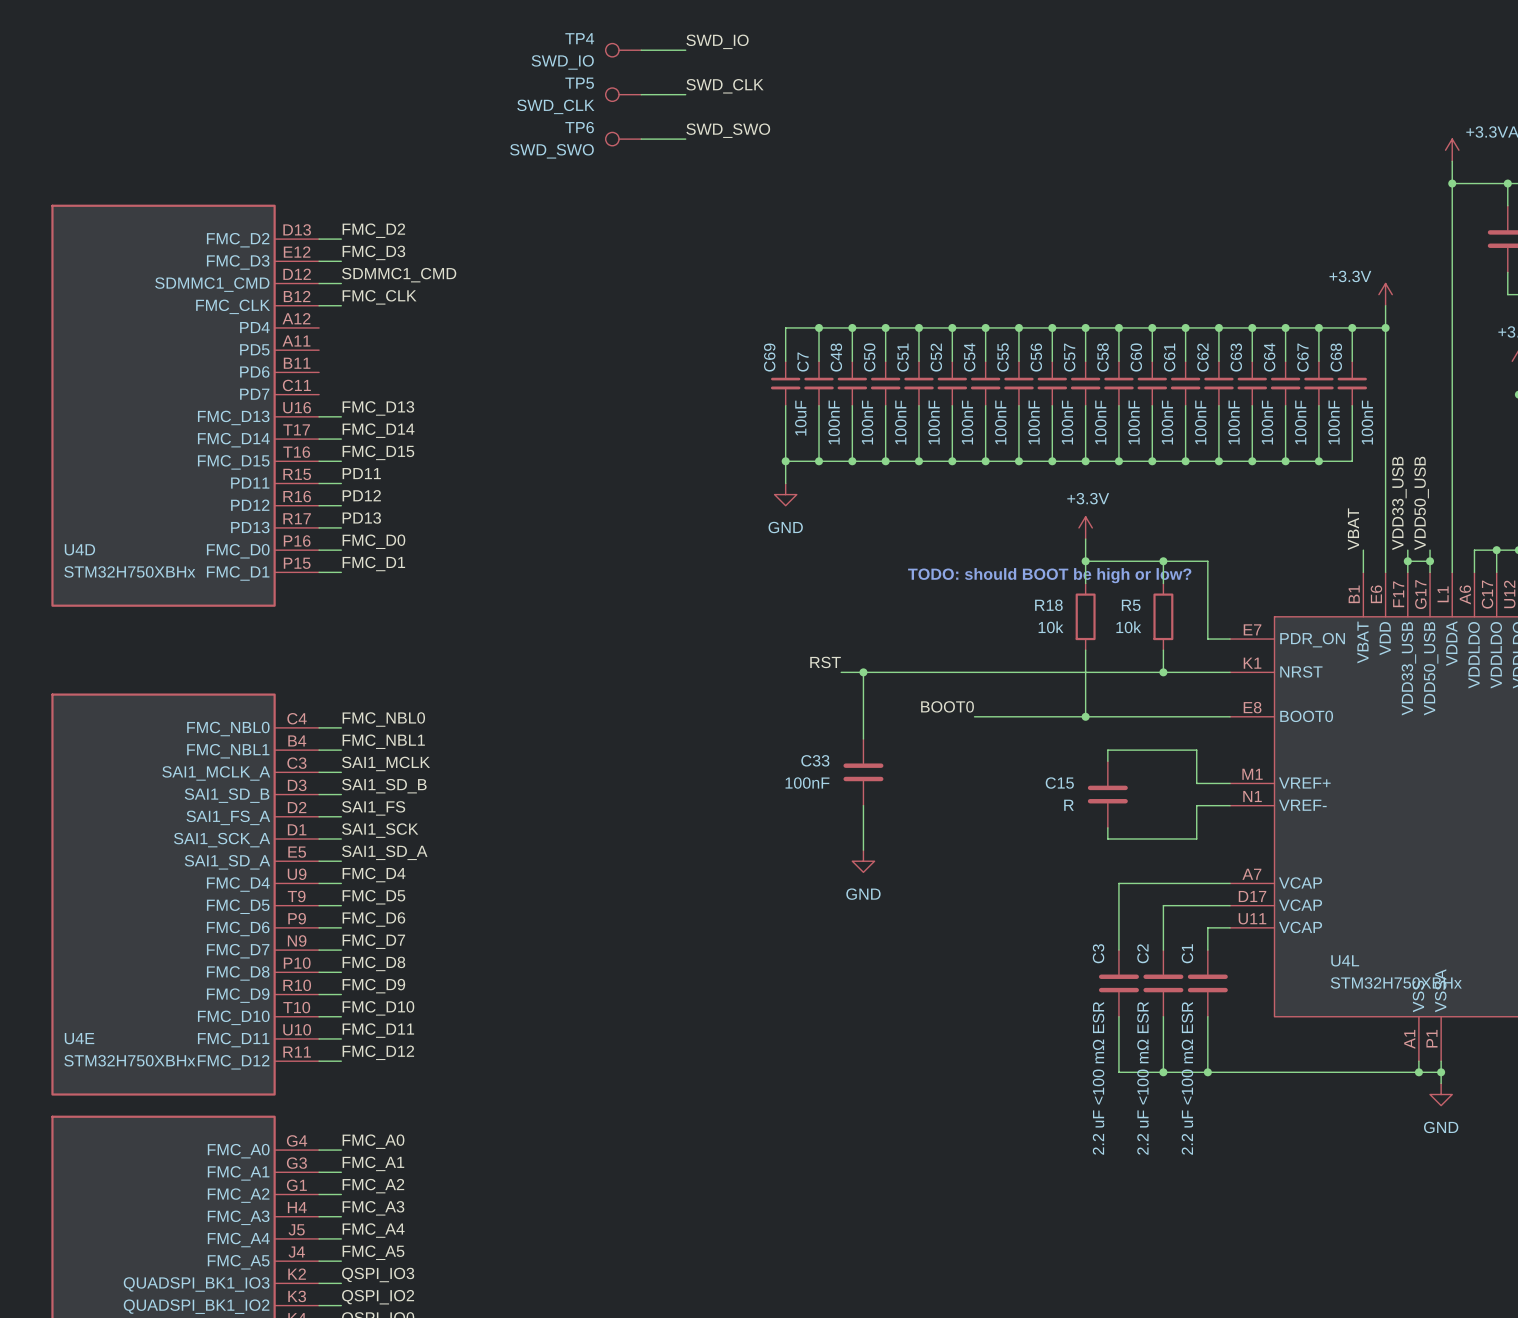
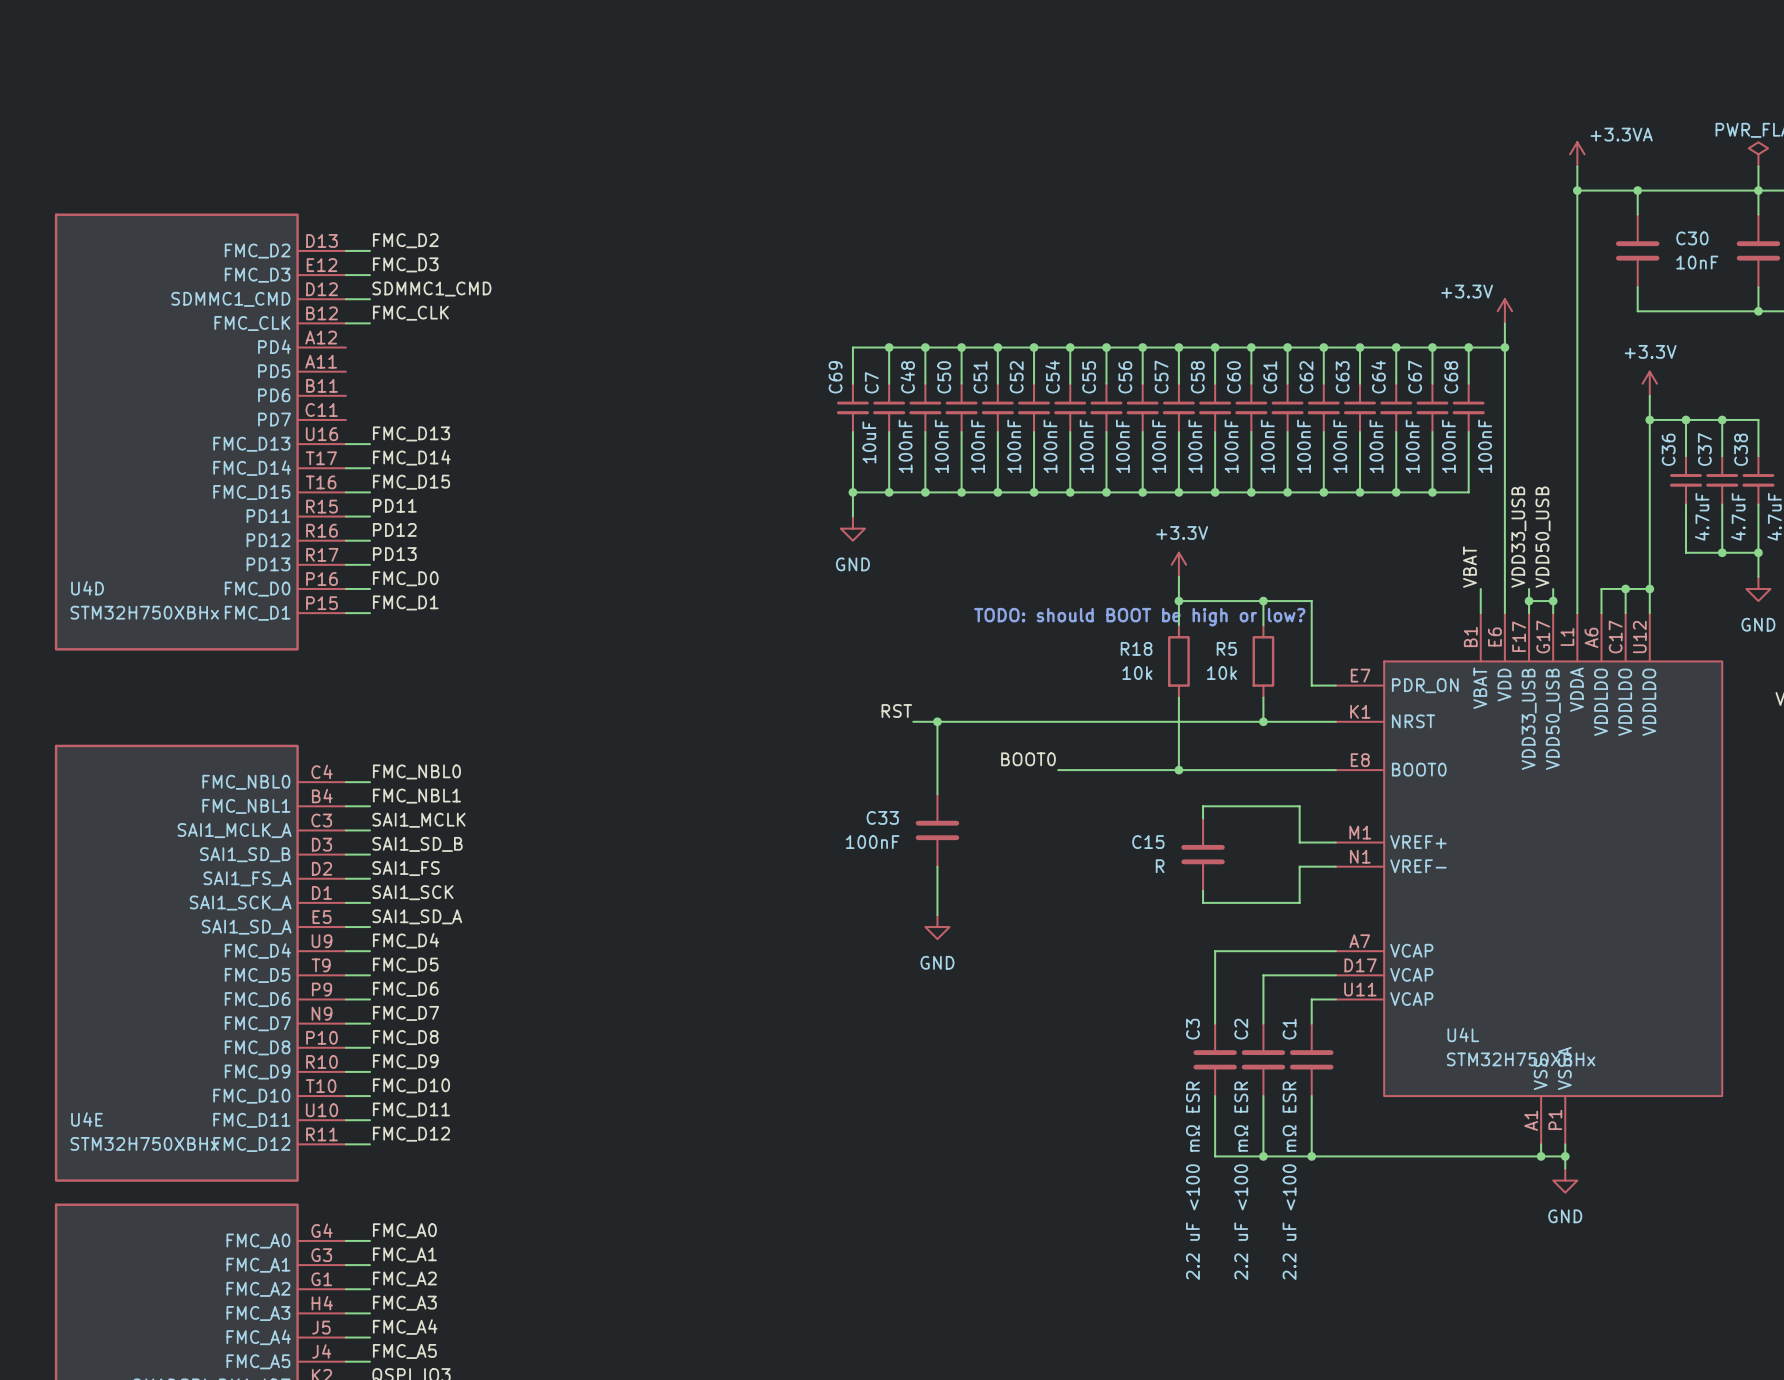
label: SWD_IO (717, 41) -> none
TP4: SWD_IO (623, 50) -> none
wire: (641, 50) (685, 50) -> none
label: SWD_CLK (725, 86) -> none
TP5: SWD_CLK (623, 94) -> none
wire: (641, 94) (685, 94) -> none
label: SWD_SWO (728, 130) -> none
TP6: SWD_SWO (623, 139) -> none
wire: (641, 139) (685, 139) -> none

